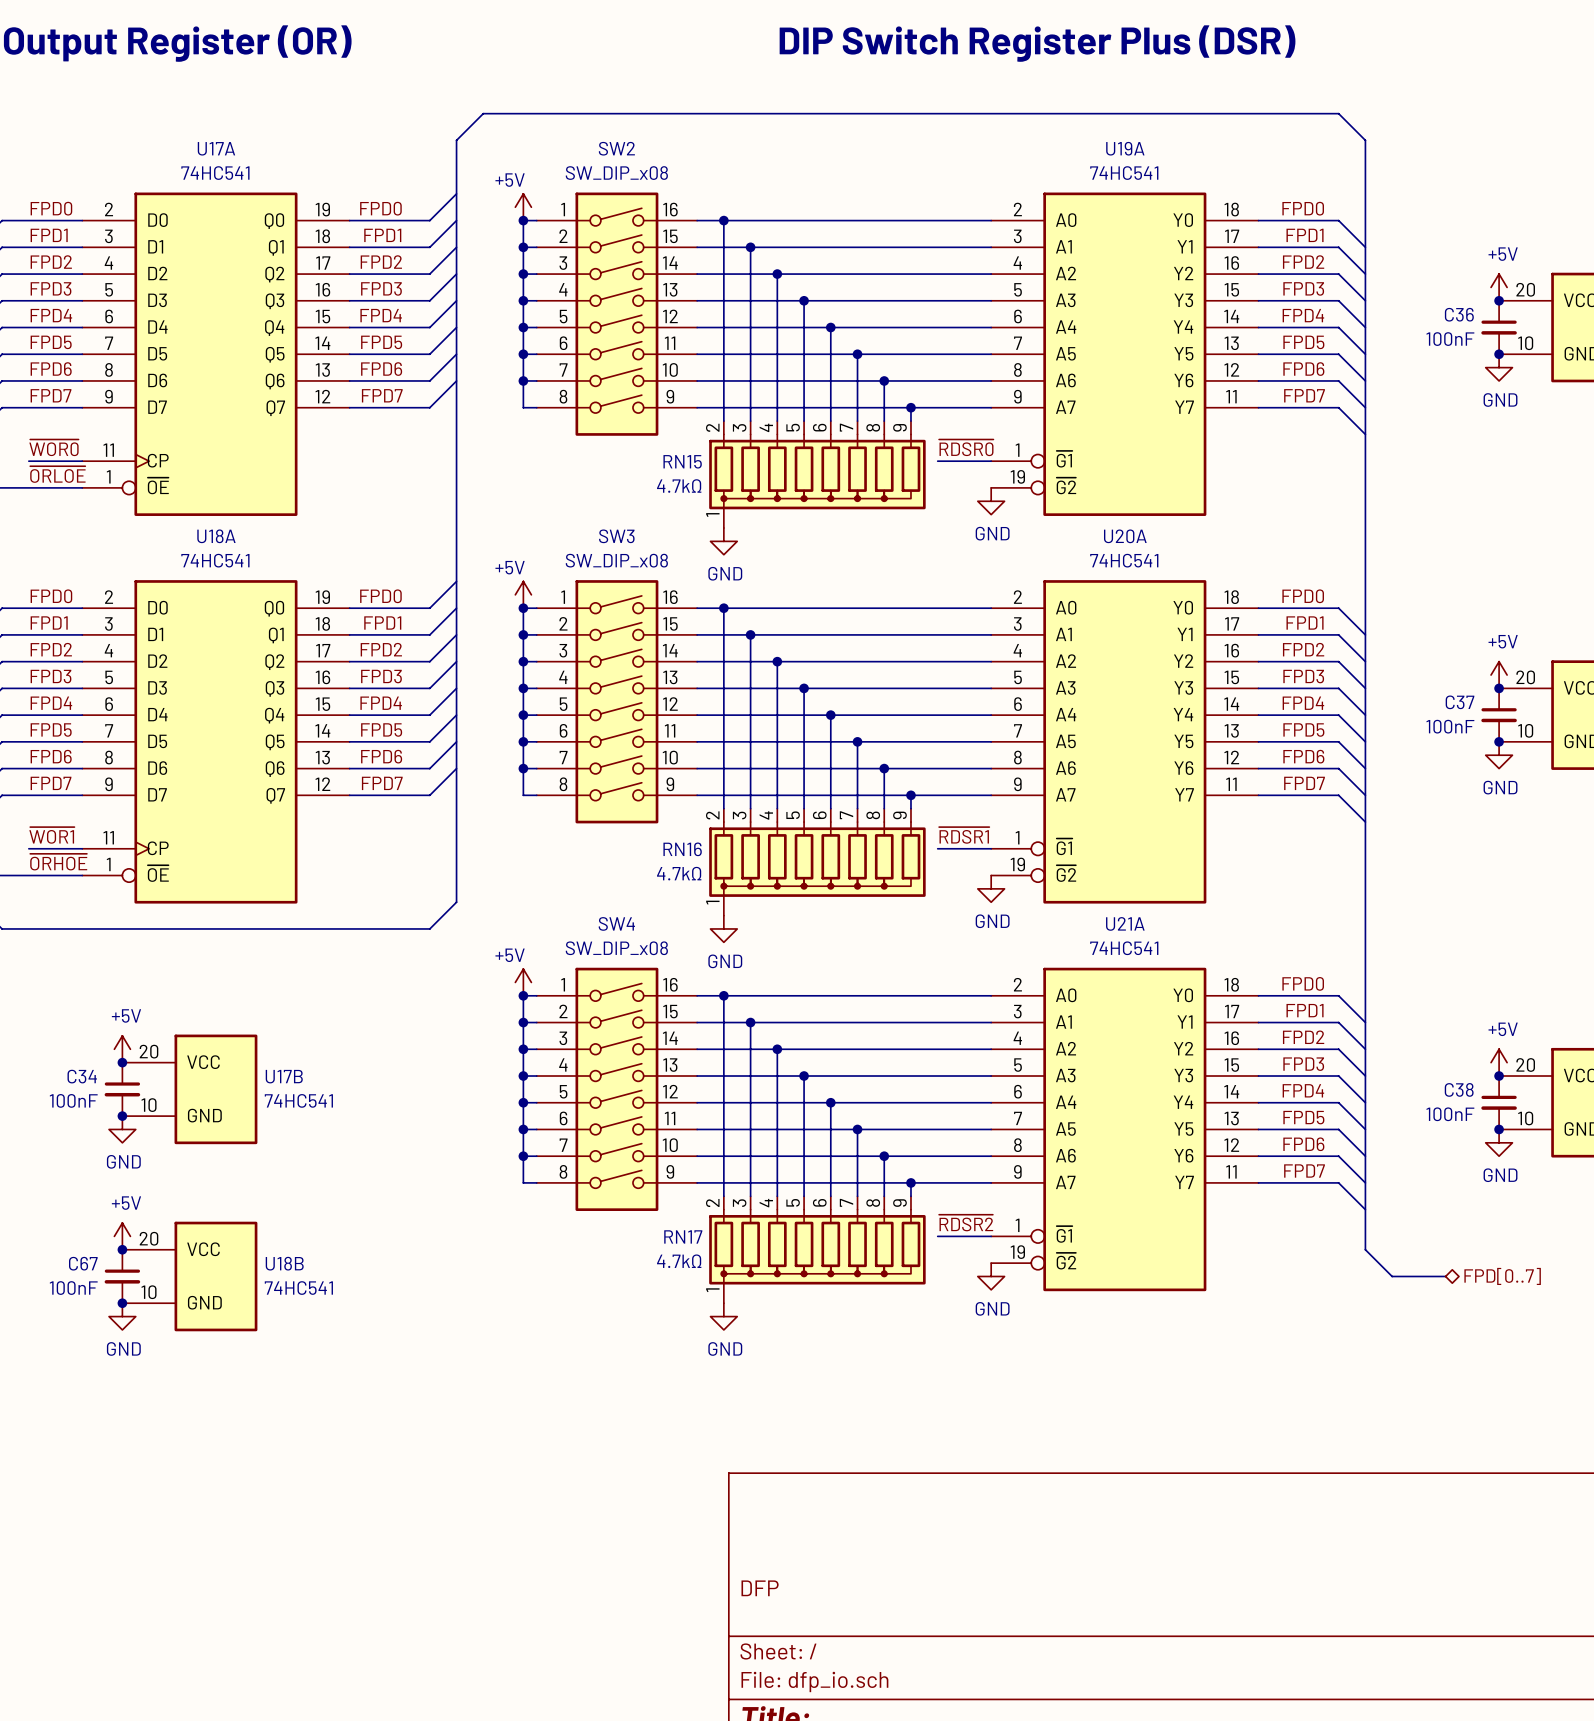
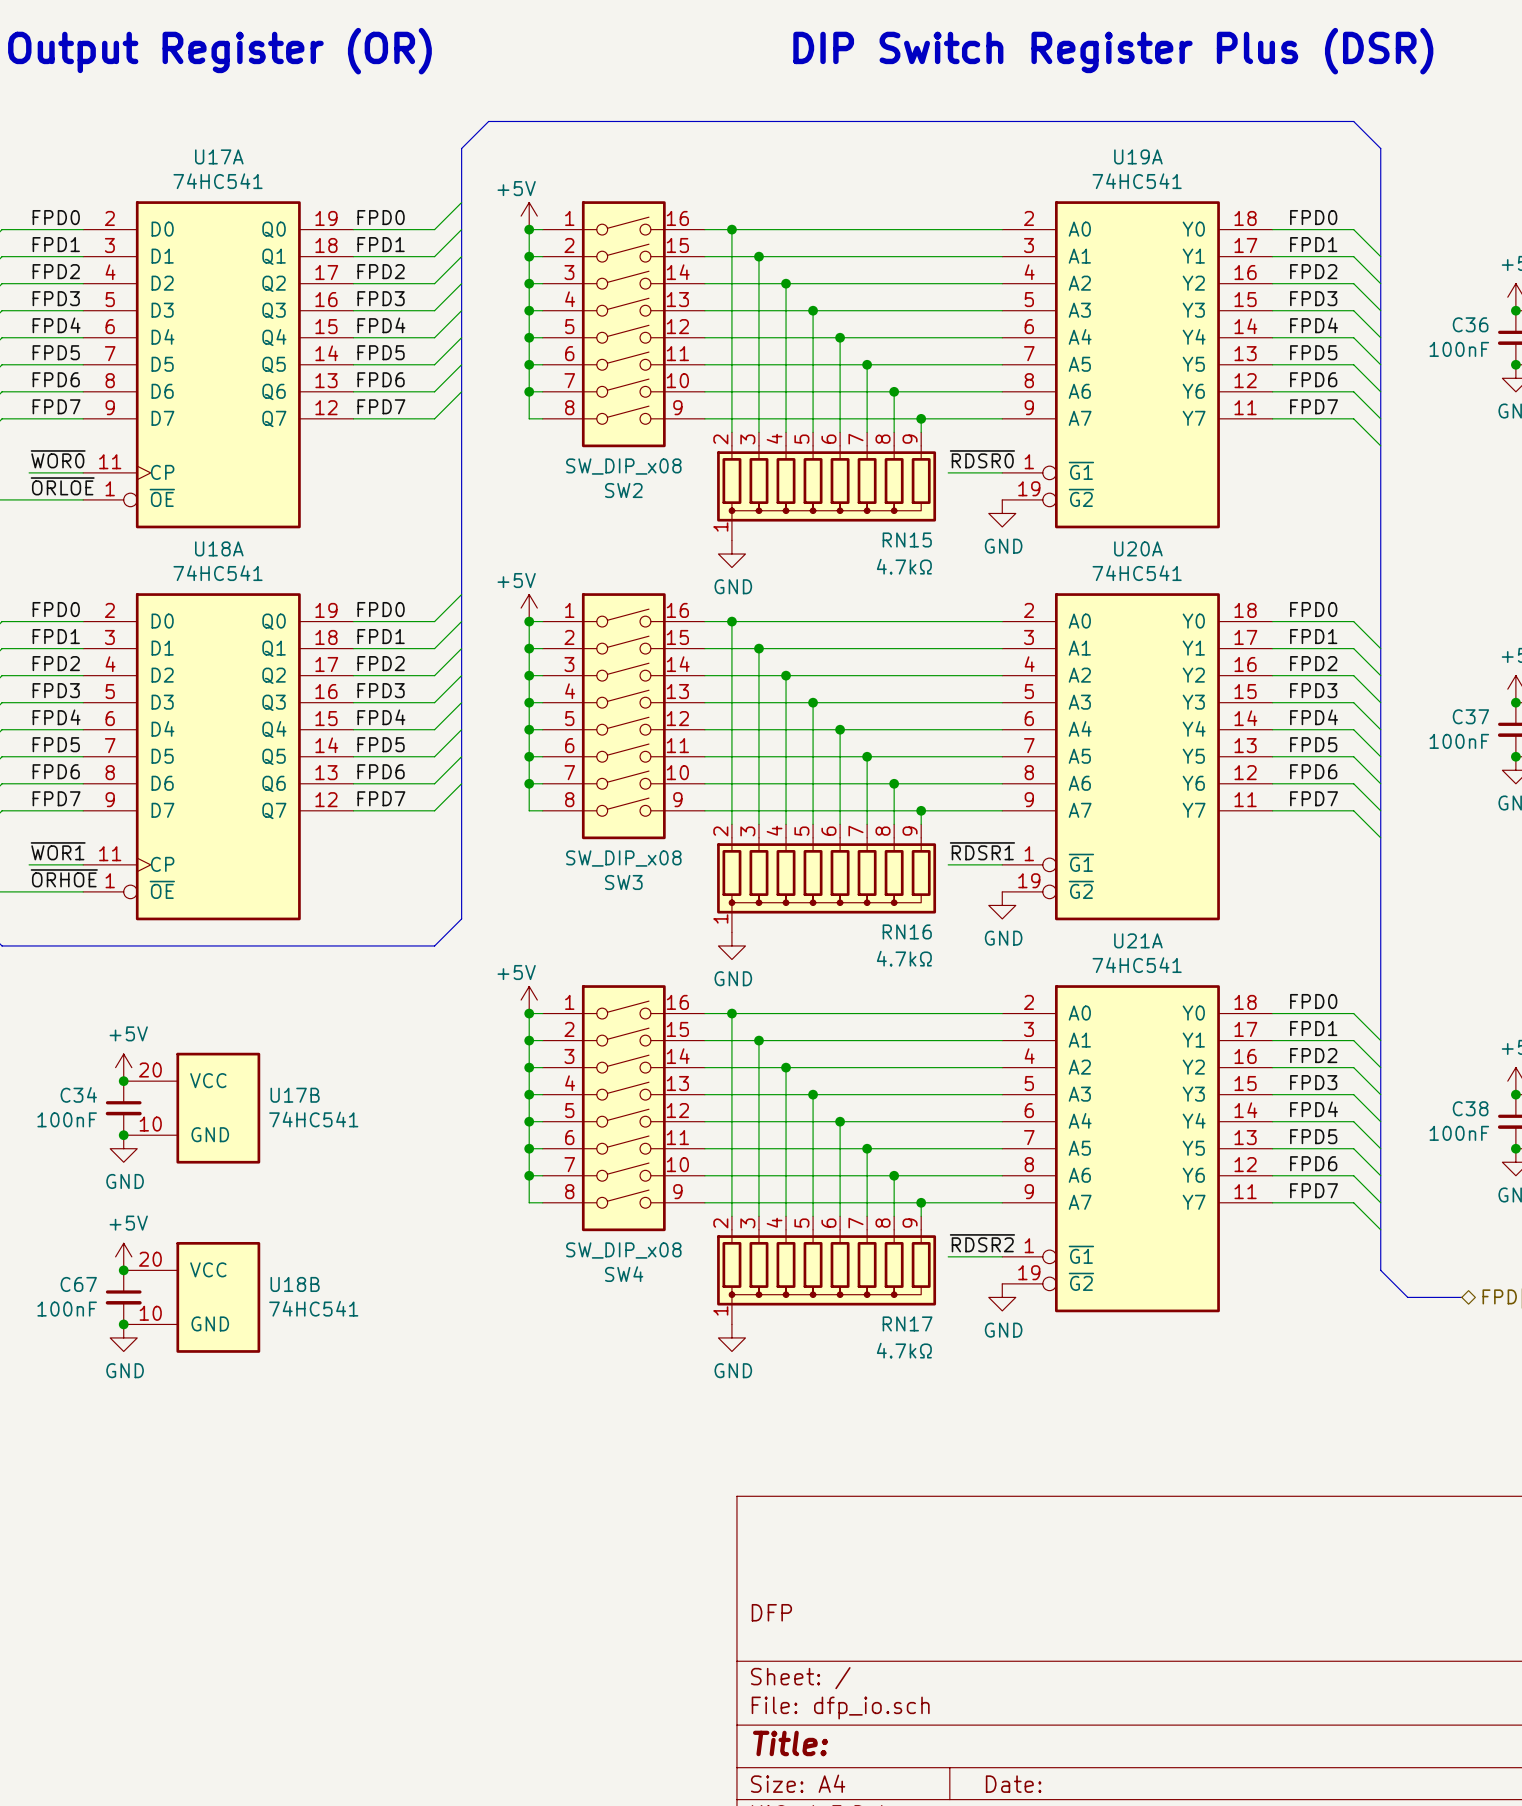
SW2 name position: SW2 (616, 148) -> SW2 (623, 490)
SW2 value position: SW_DIP_x08 (616, 173) -> SW_DIP_x08 (623, 466)
RN15 name position: RN15 (682, 461) -> RN15 (907, 539)
RN15 value position: 4.7kΩ (679, 486) -> 4.7kΩ (904, 566)
SW3 name position: SW3 (616, 536) -> SW3 (623, 882)
SW3 value position: SW_DIP_x08 (616, 560) -> SW_DIP_x08 (623, 858)
RN16 name position: RN16 (682, 849) -> RN16 (907, 931)
RN16 value position: 4.7kΩ (679, 873) -> 4.7kΩ (904, 958)
SW4 name position: SW4 (616, 923) -> SW4 (624, 1274)
SW4 value position: SW_DIP_x08 (616, 948) -> SW_DIP_x08 (623, 1250)
RN17 name position: RN17 (683, 1236) -> RN17 (907, 1323)
RN17 value position: 4.7kΩ (679, 1261) -> 4.7kΩ (904, 1350)

